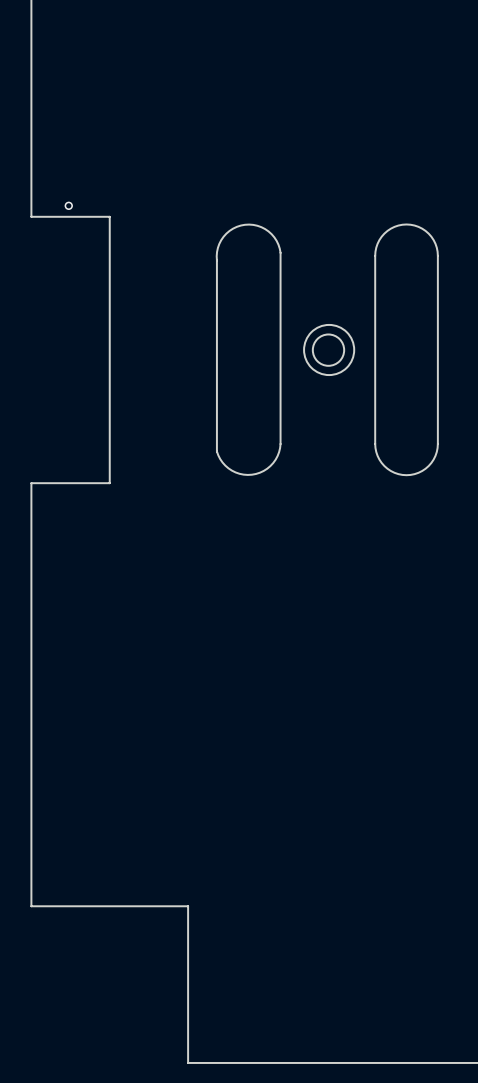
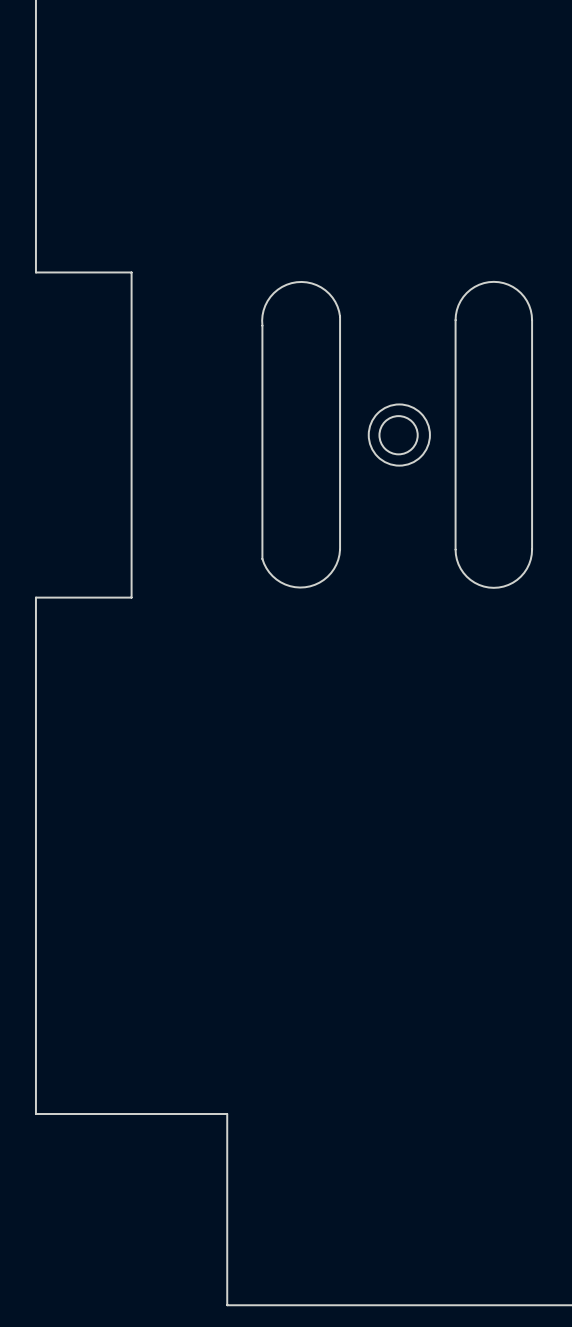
via: (68, 205) -> none

